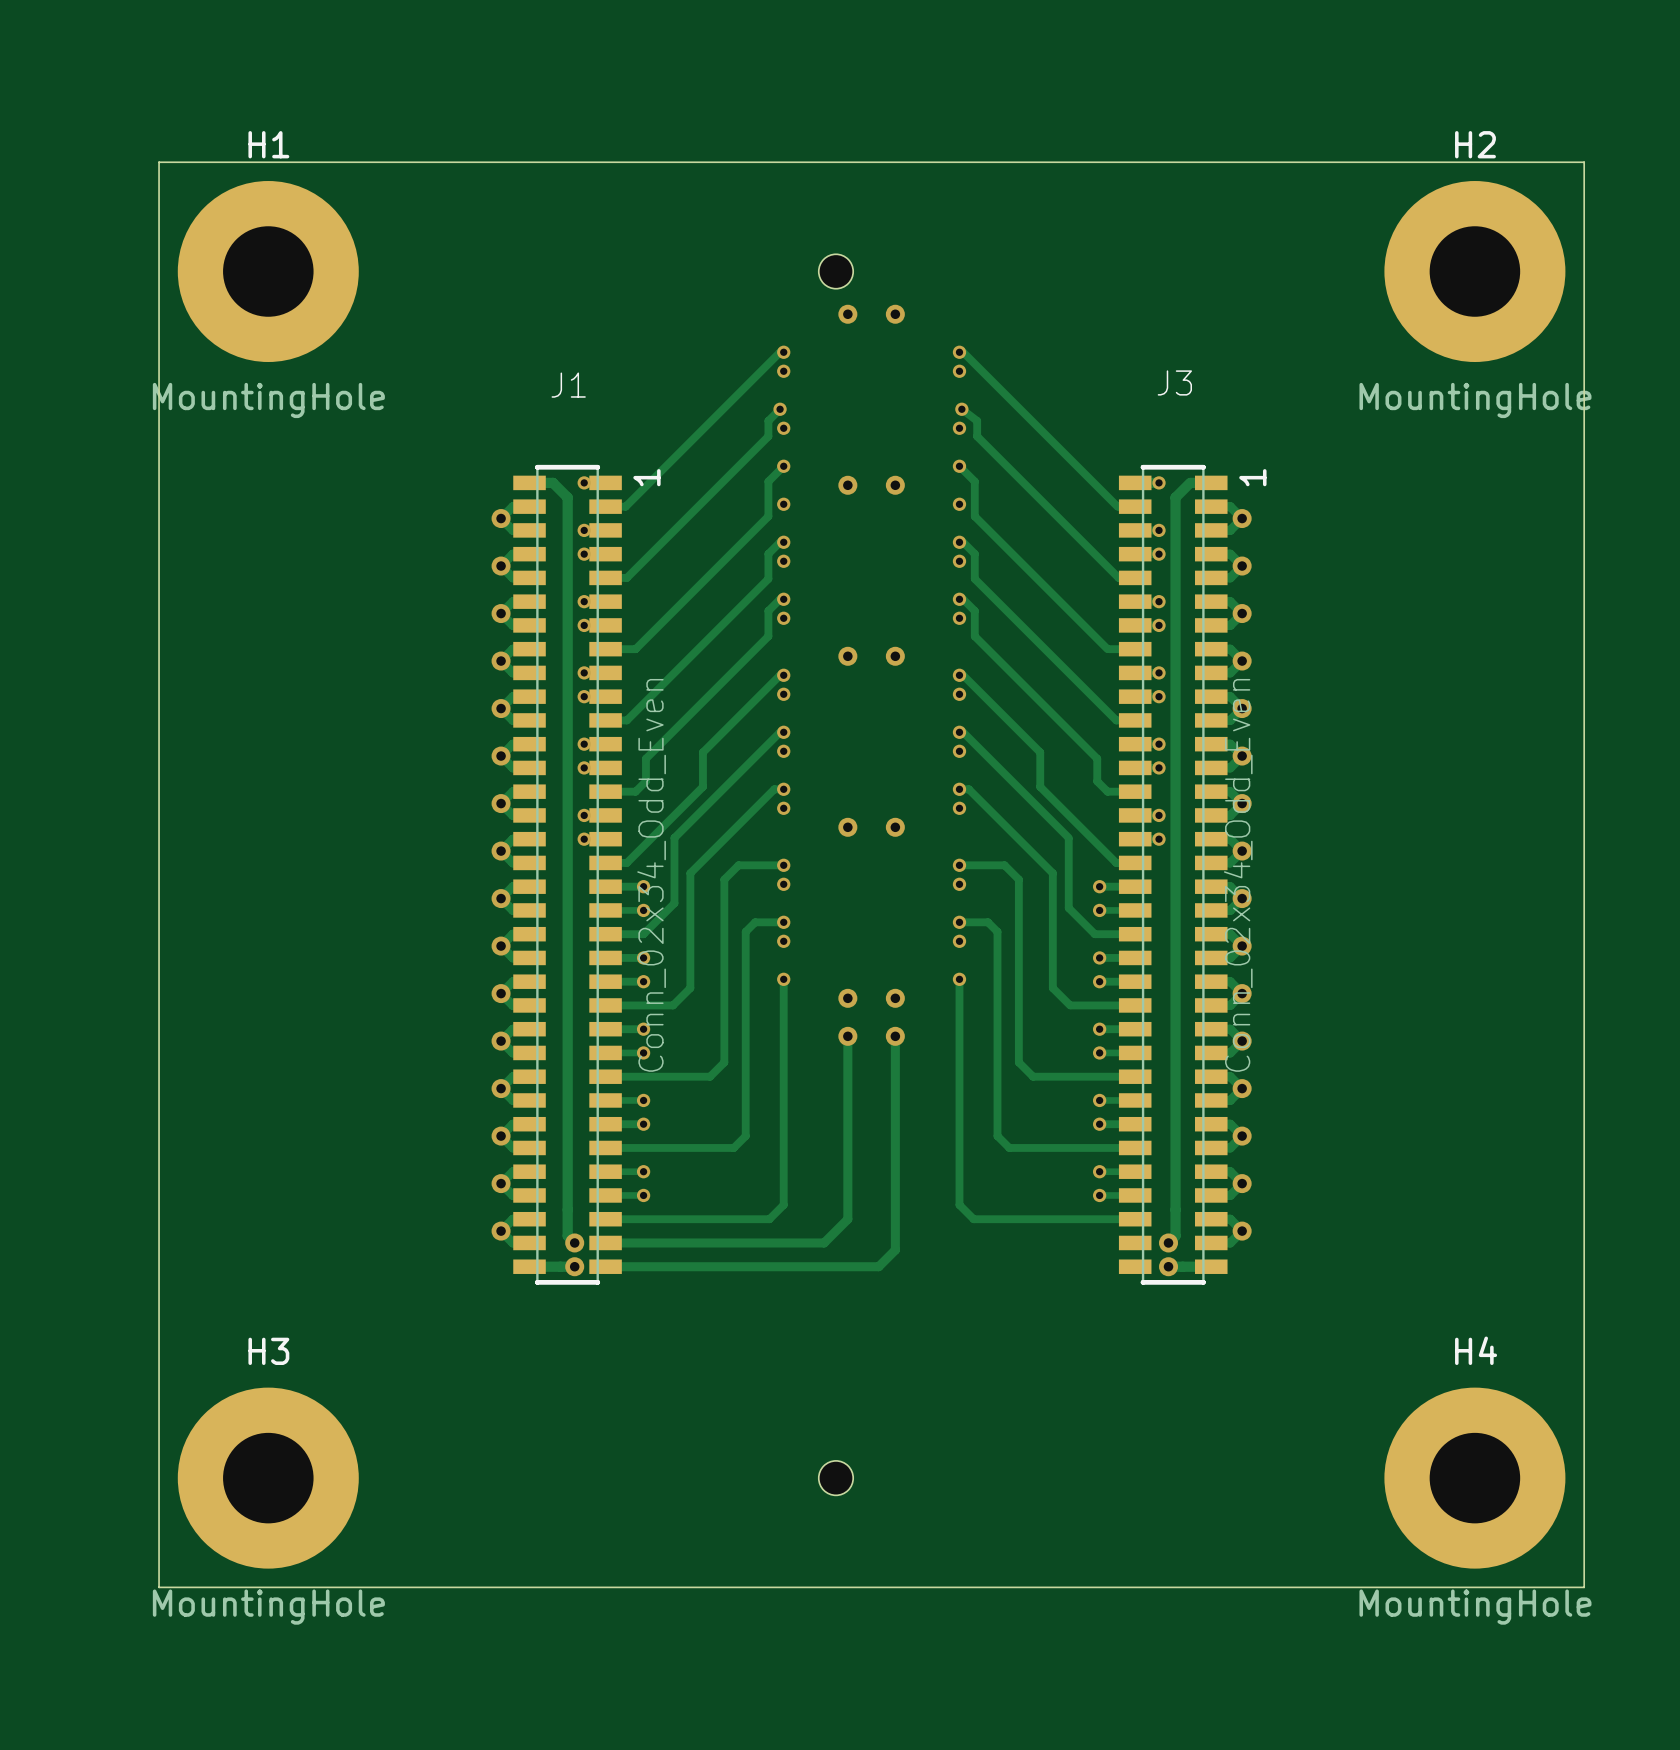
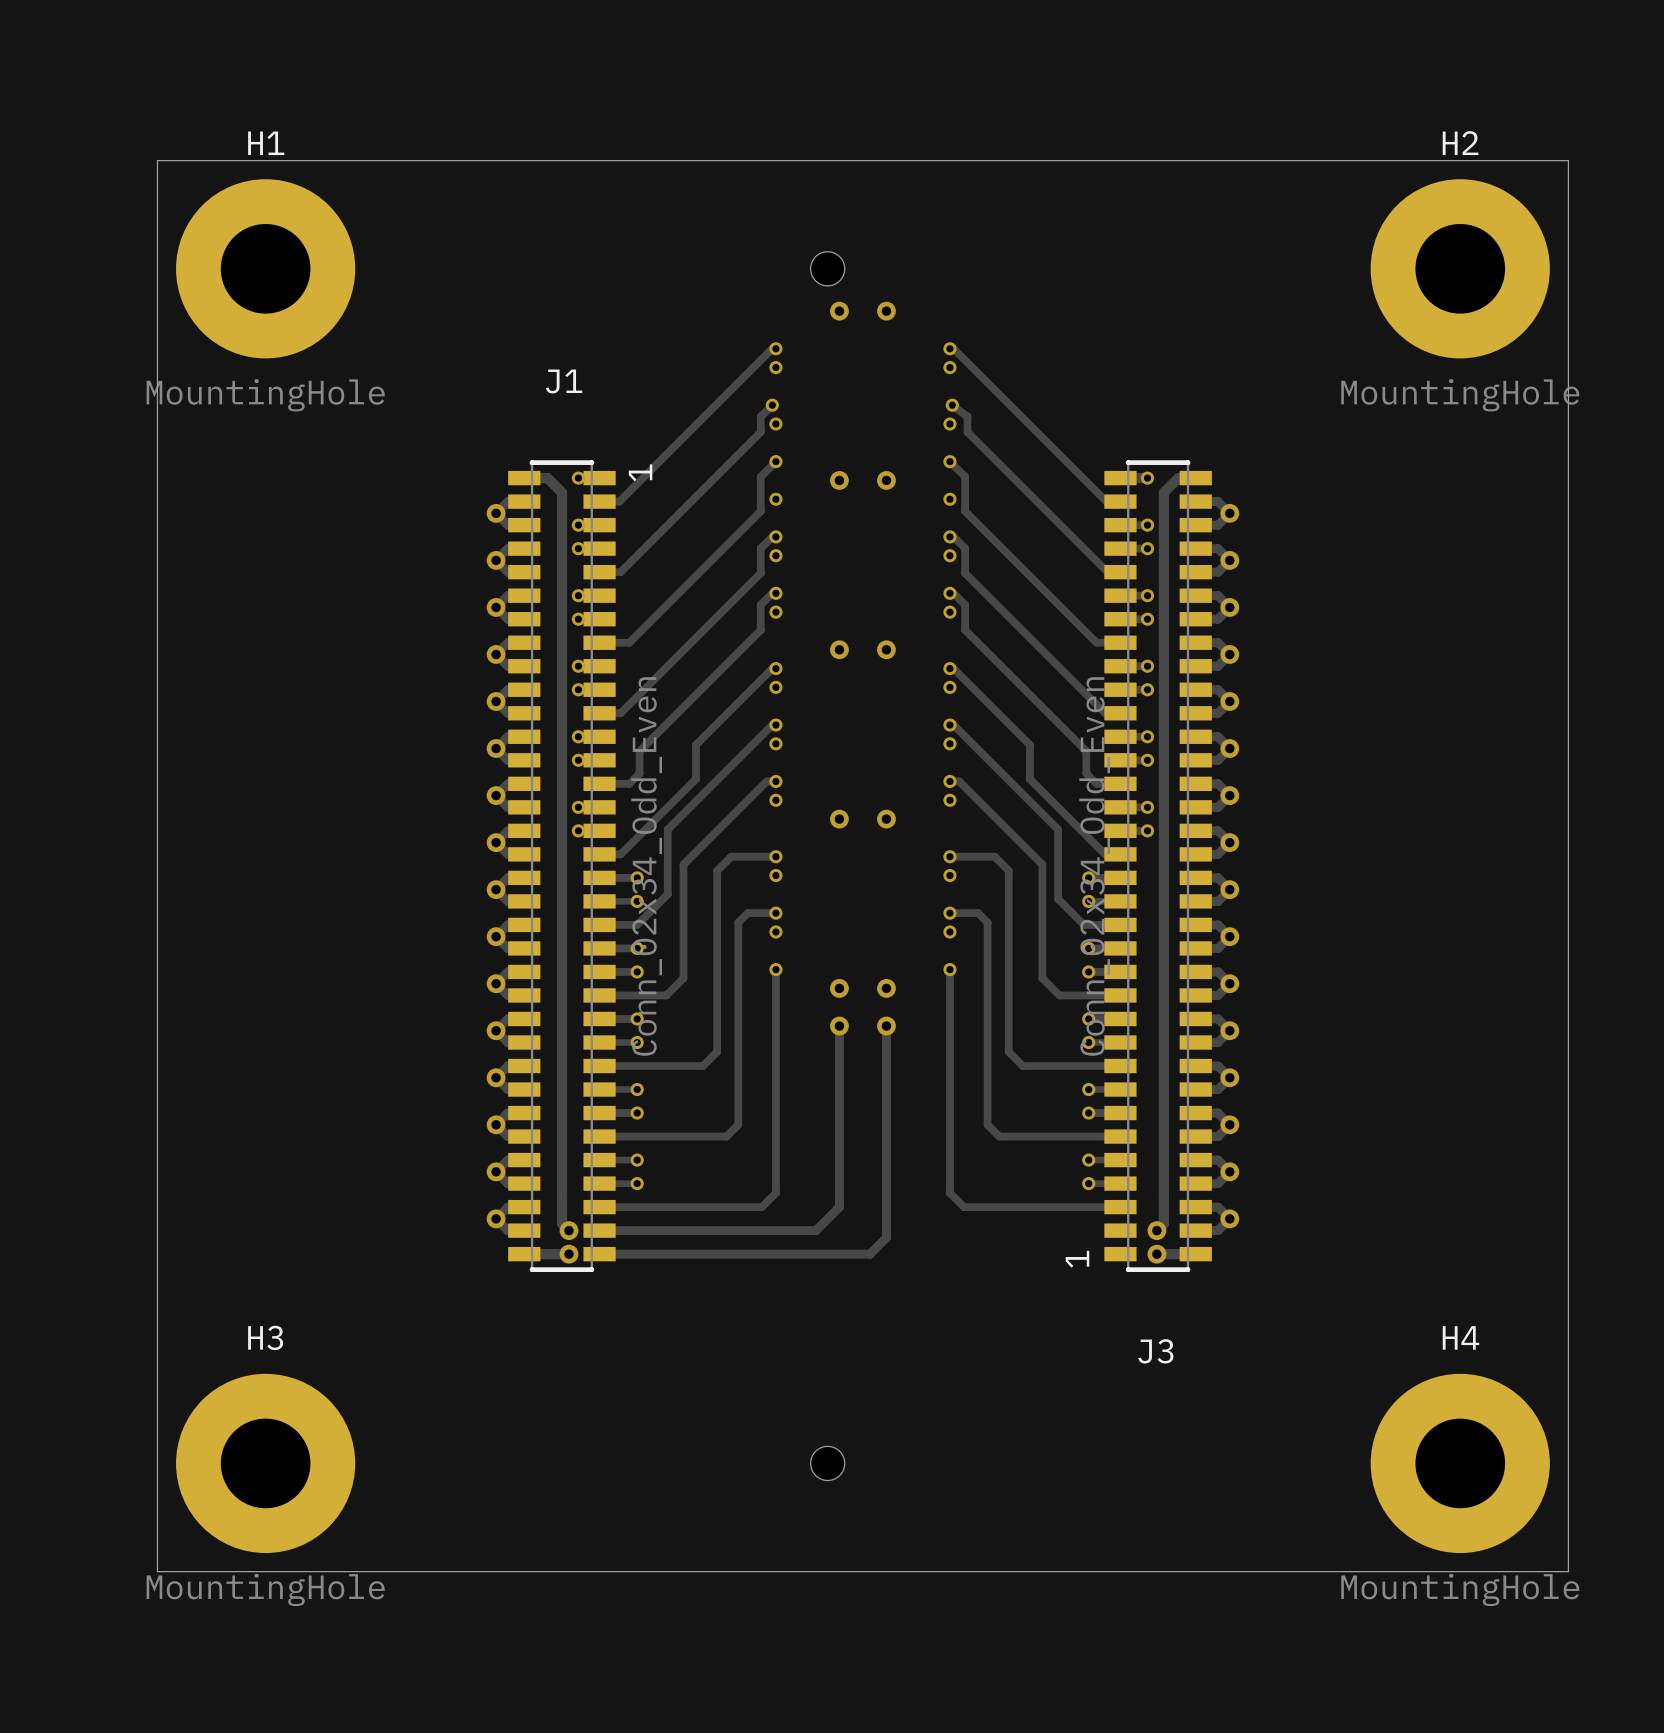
J3 rotation: 0° (1173, 874) -> 180° (1158, 866)

